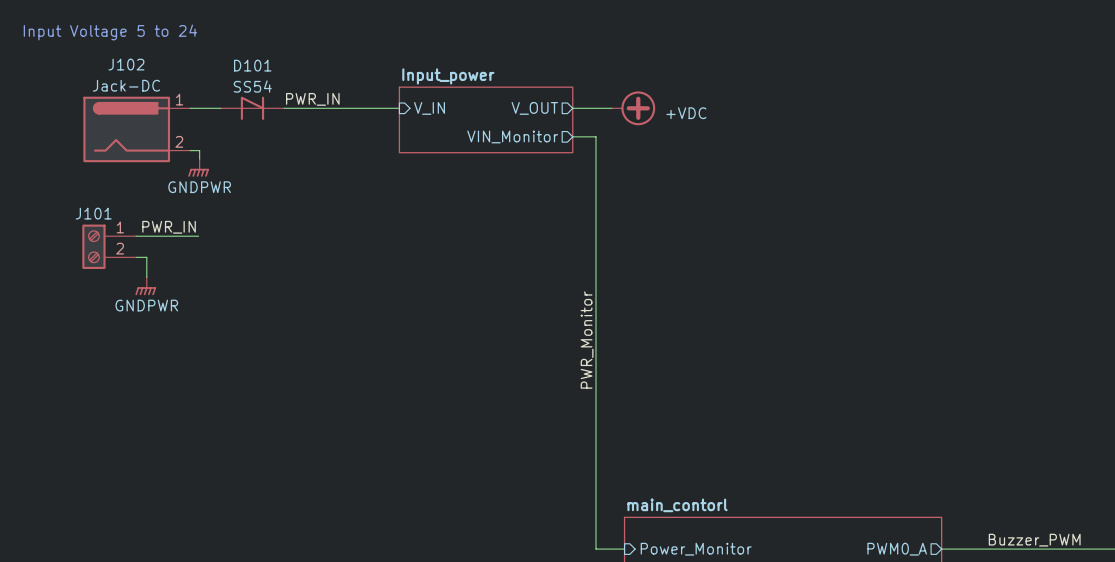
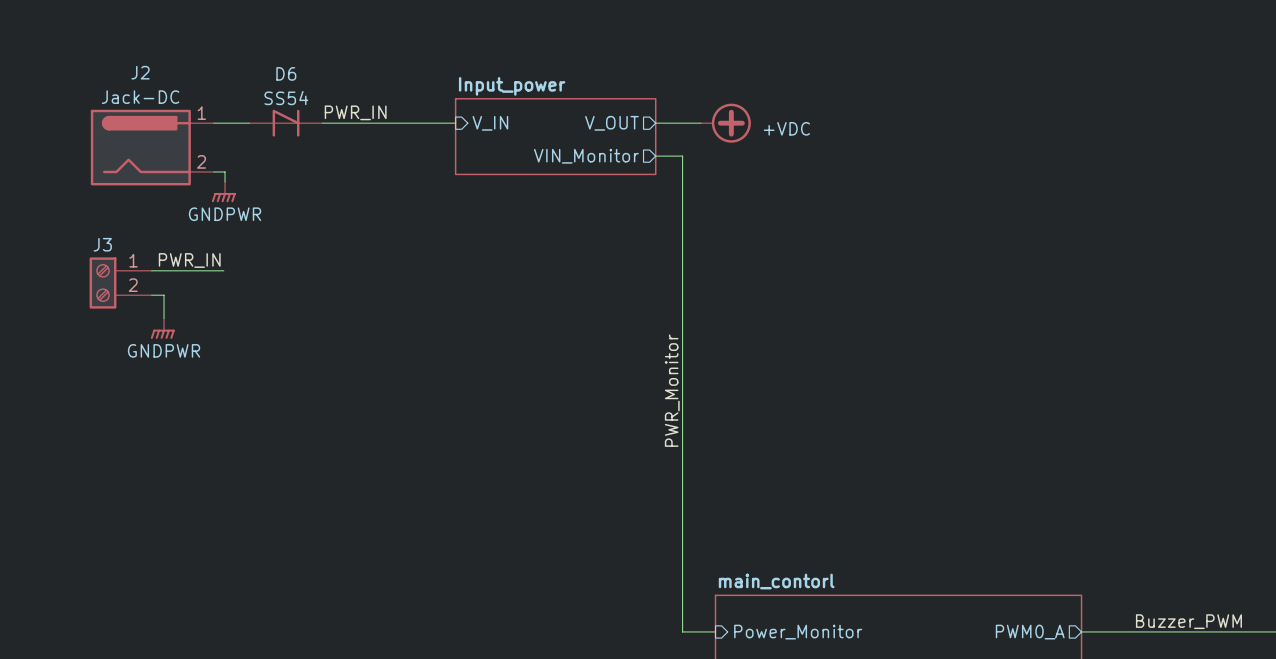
text: Input Voltage 5 to 24 (110, 32) -> none
J102 name: J102 (126, 64) -> J2 (140, 72)
D101 name: D101 (252, 65) -> D6 (286, 73)
J101 name: J101 (93, 213) -> J3 (102, 244)

